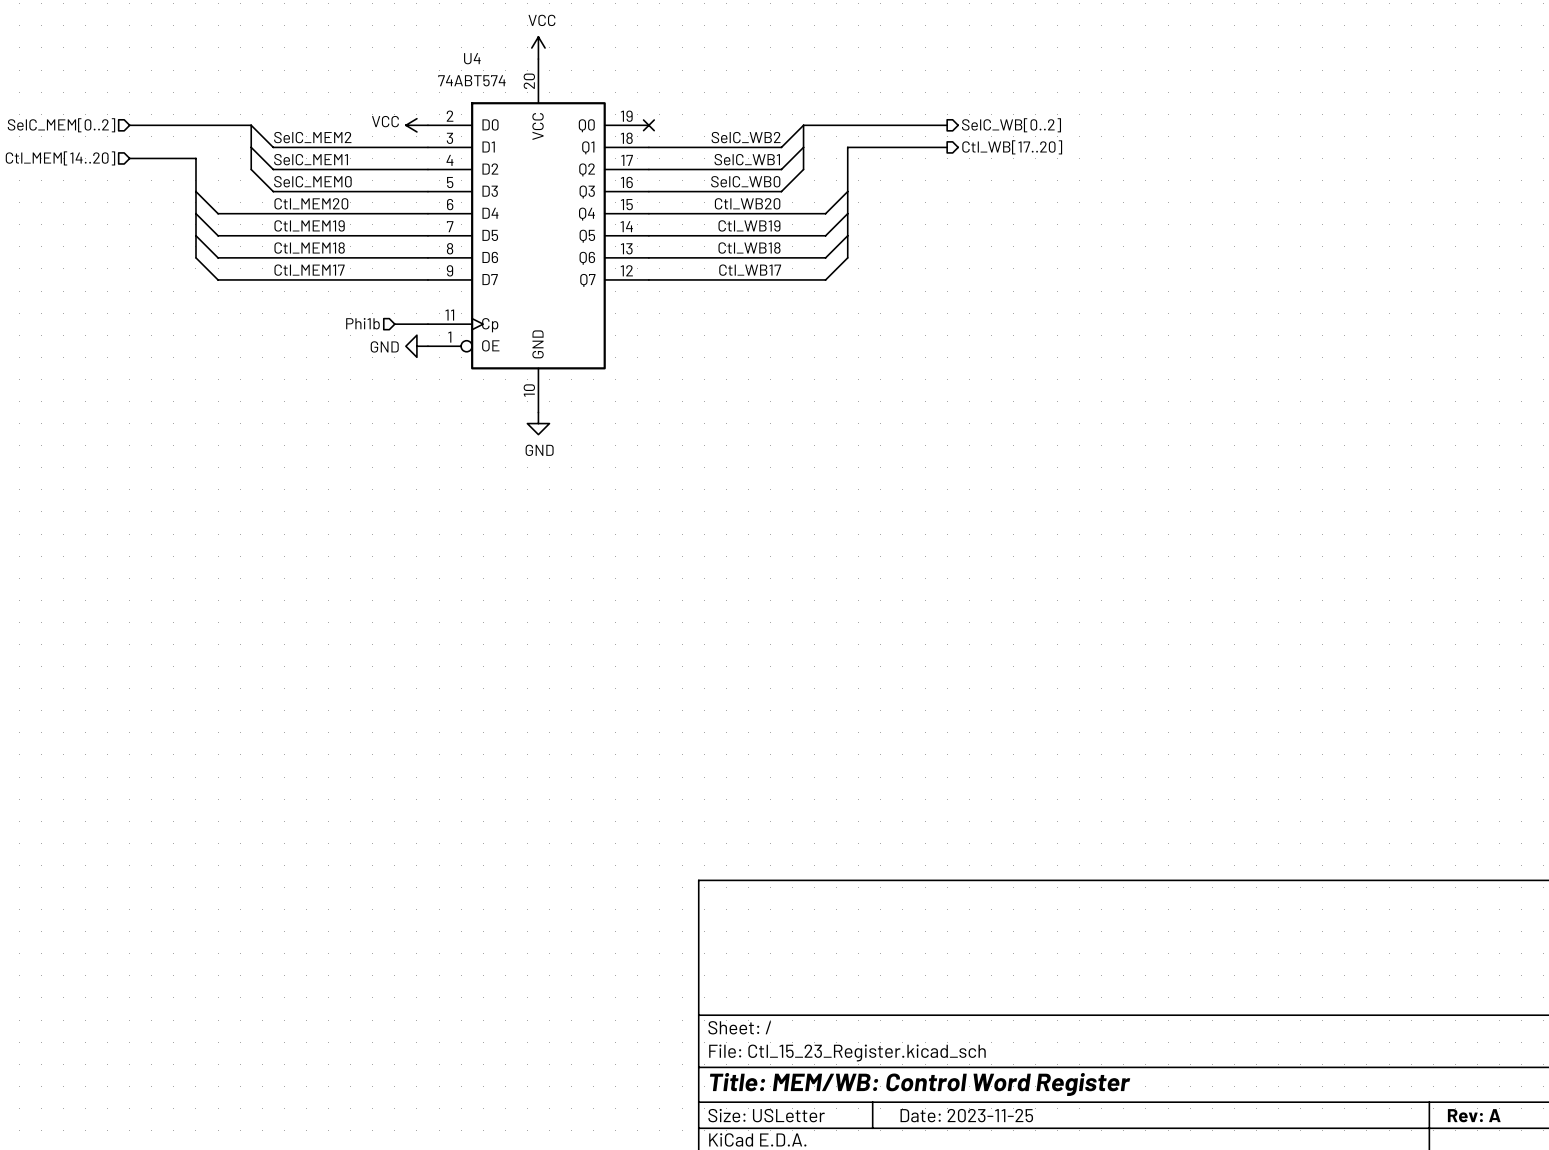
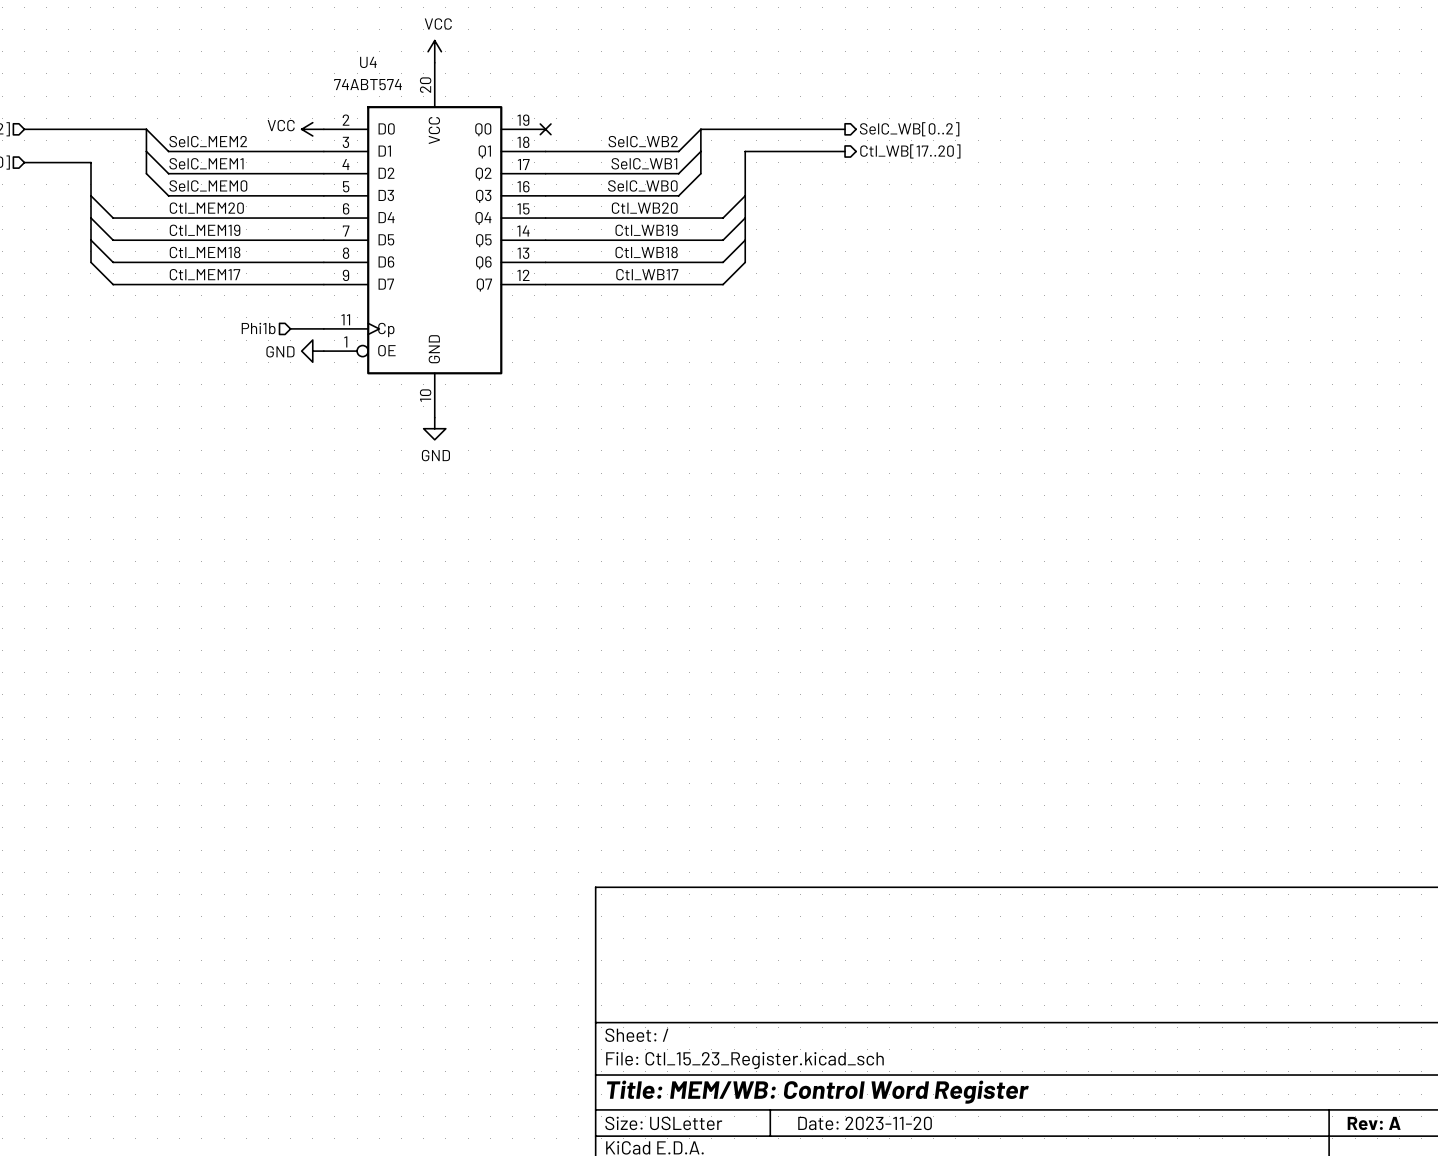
title block: Date: 2023-11-25 (966, 1115) -> Date: 2023-11-20 (865, 1123)

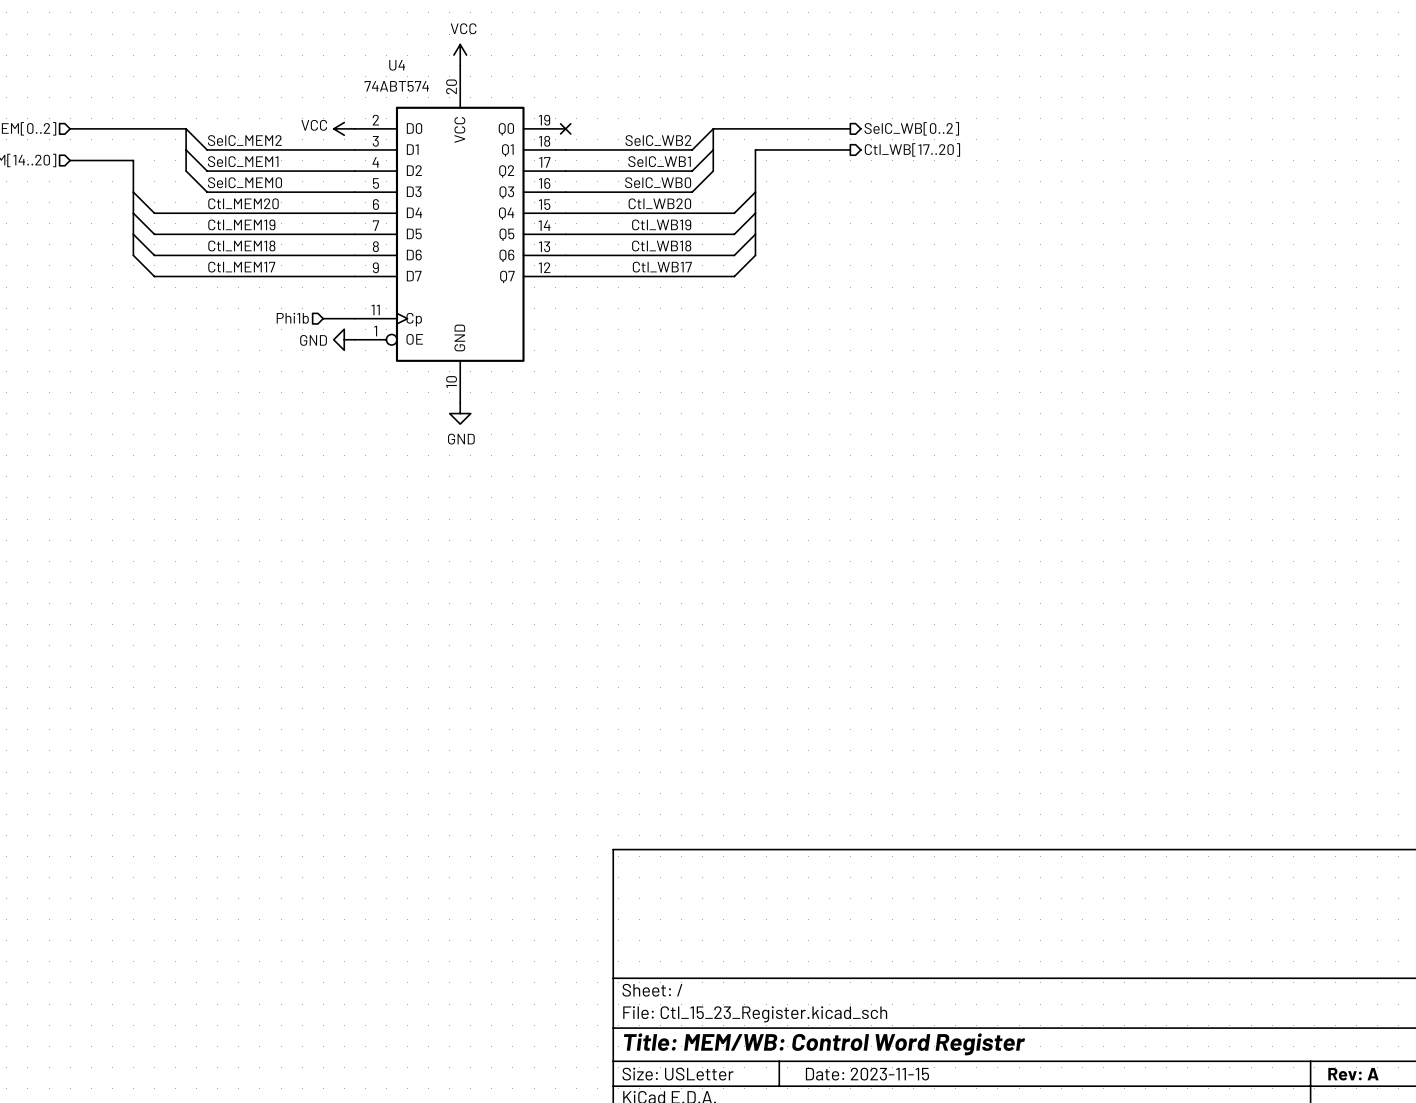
title block: Date: 2023-11-20 (865, 1123) -> Date: 2023-11-15 (867, 1074)

